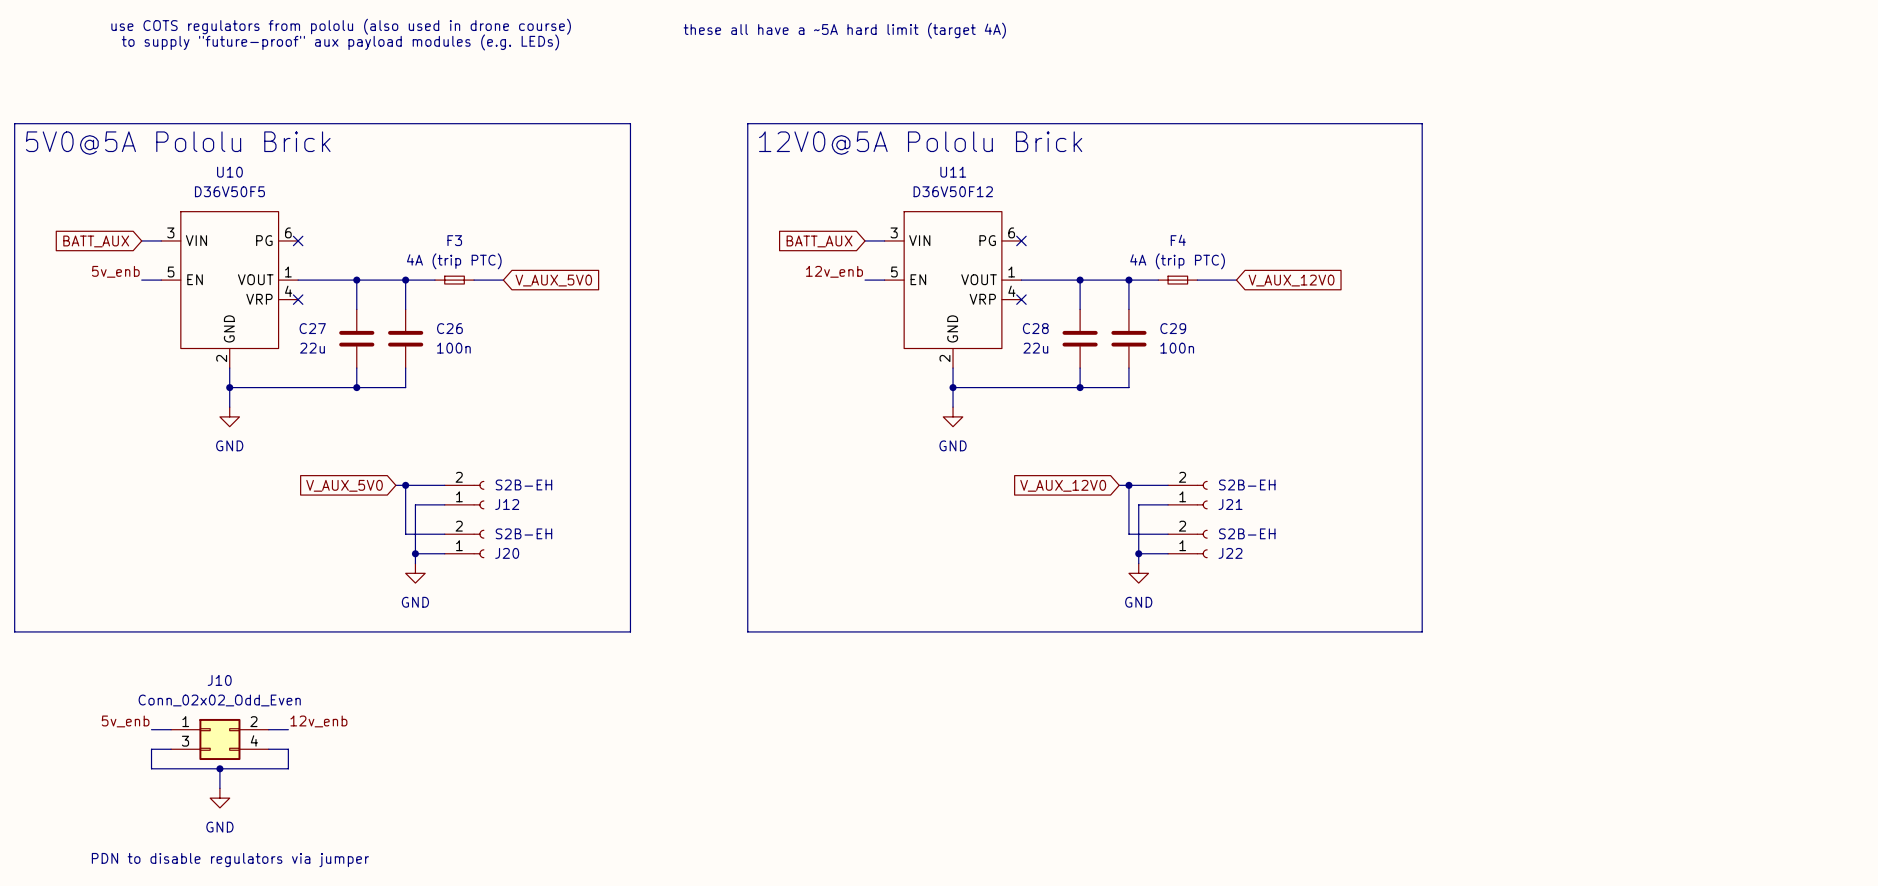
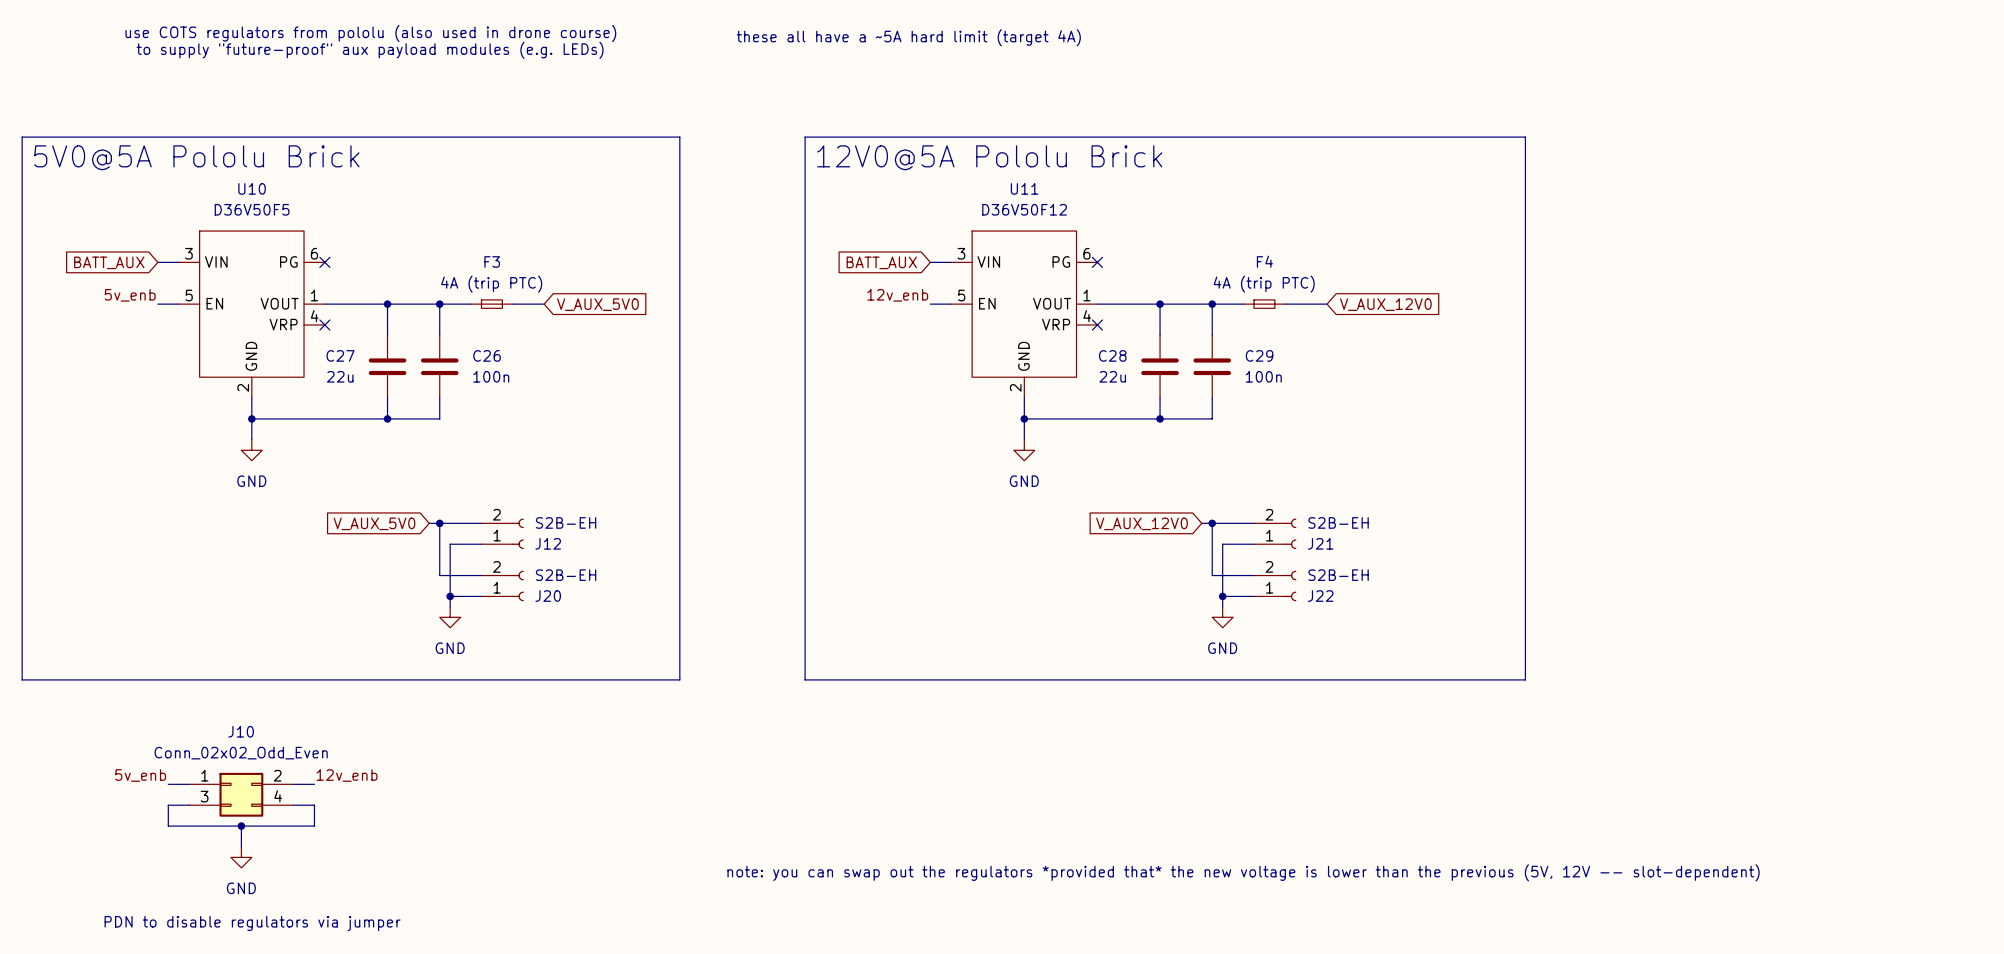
text: none -> note: you can swap out the regulators *provided that* the new voltage is lower than the previous (5V, 12V -- slot-dependent) (1243, 872)

